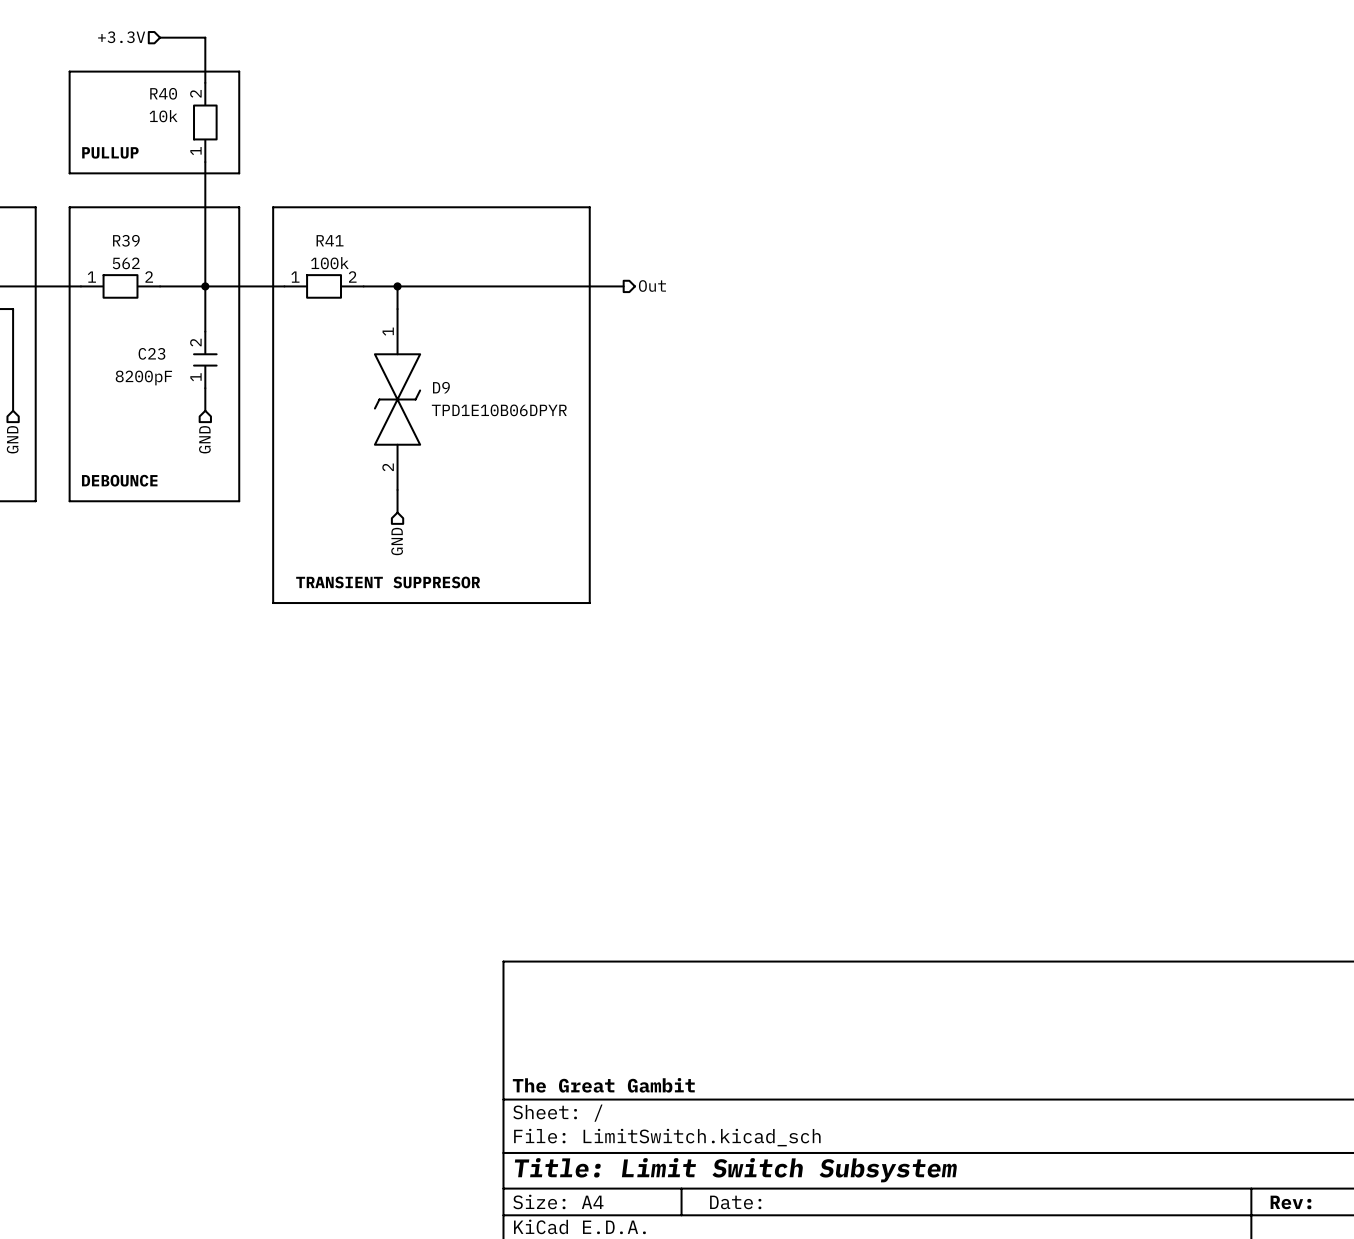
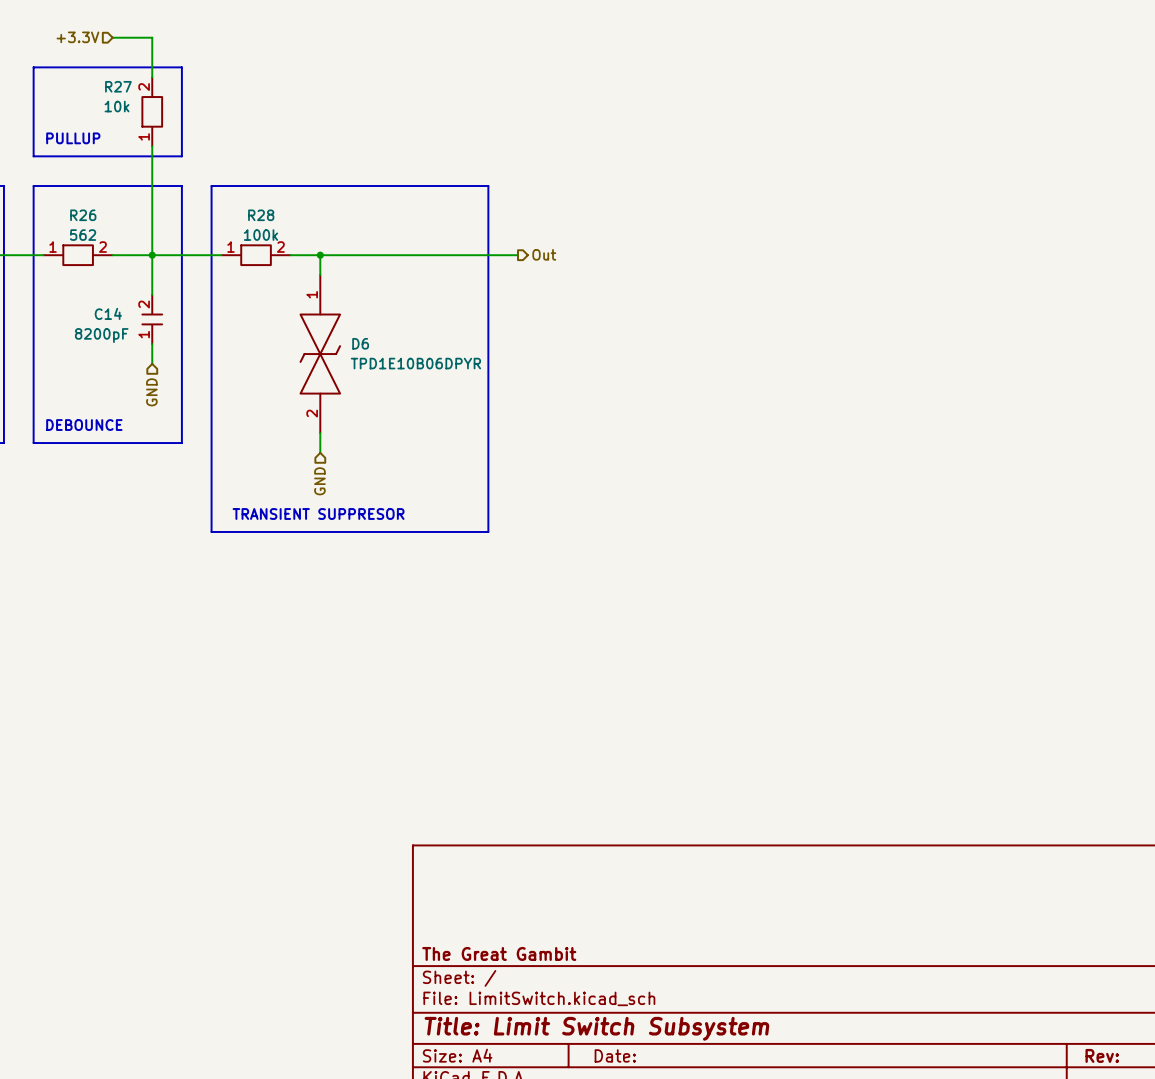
R40 name: R40 (163, 93) -> R27 (118, 86)
R39 name: R39 (126, 240) -> R26 (83, 215)
R41 name: R41 (330, 240) -> R28 (261, 215)
C23 name: C23 (151, 353) -> C14 (108, 313)
D9 name: D9 (441, 387) -> D6 (360, 343)

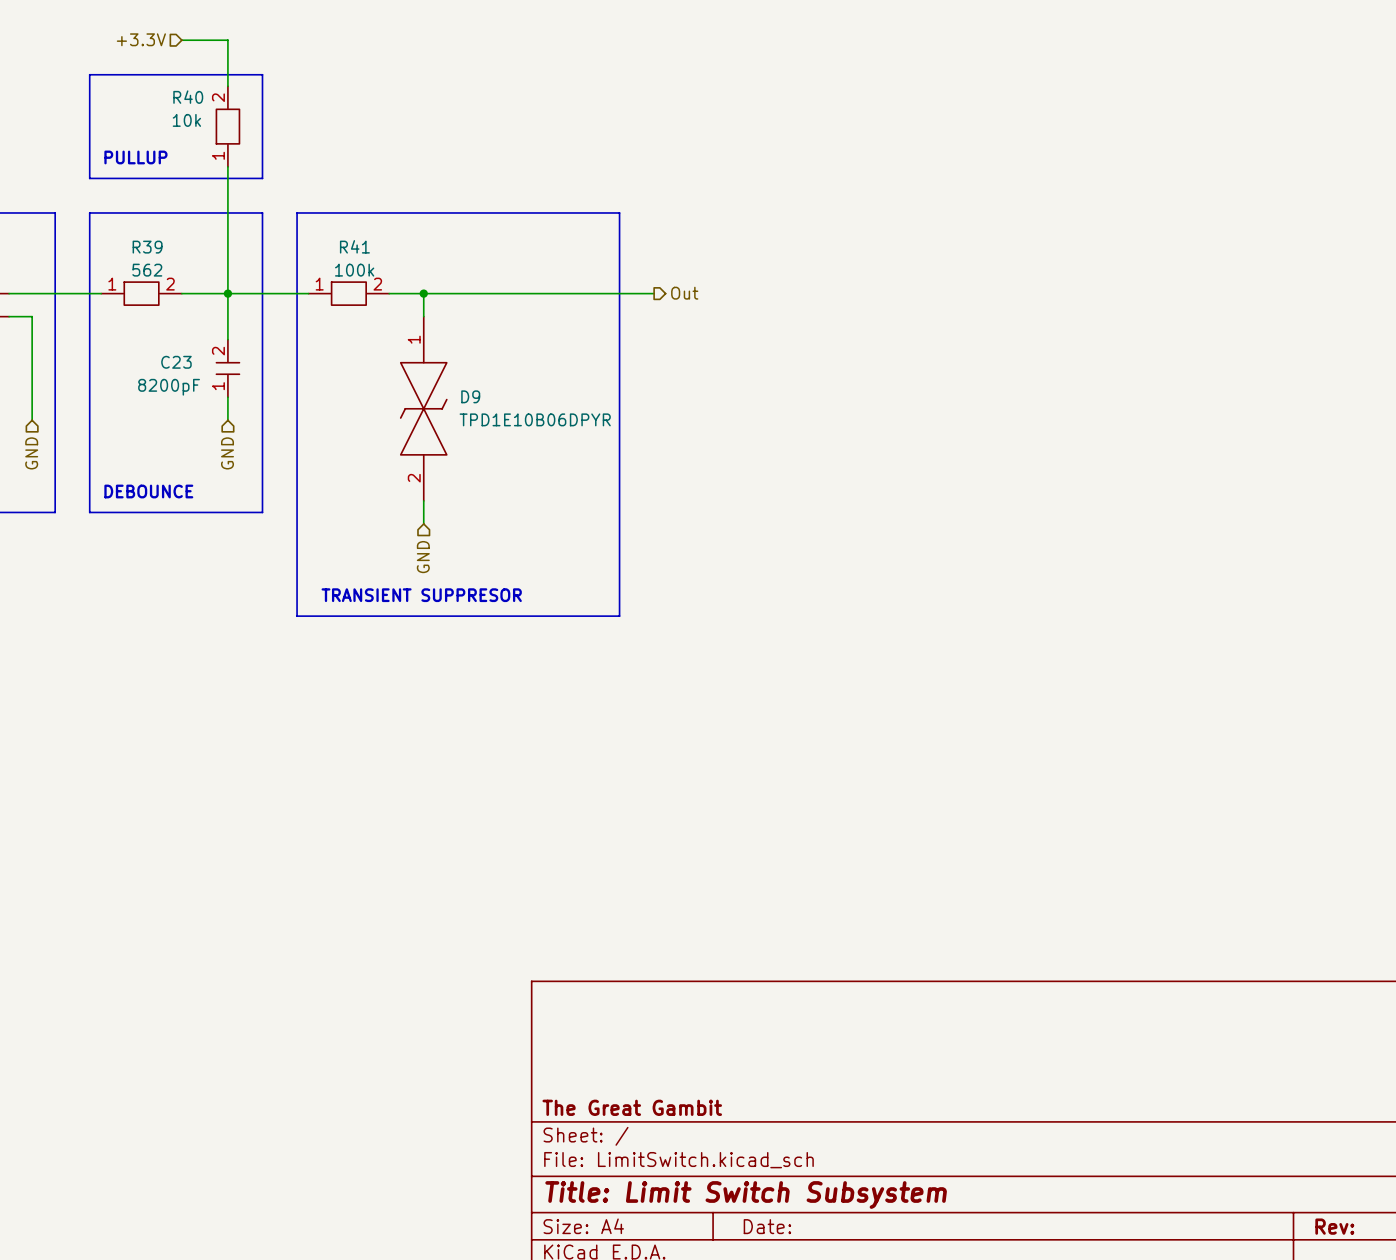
R27 name: R27 (118, 86) -> R40 (188, 97)
R26 name: R26 (83, 215) -> R39 (147, 247)
R28 name: R28 (261, 215) -> R41 (354, 246)
C14 name: C14 (108, 313) -> C23 (176, 362)
D6 name: D6 (360, 343) -> D9 (470, 396)

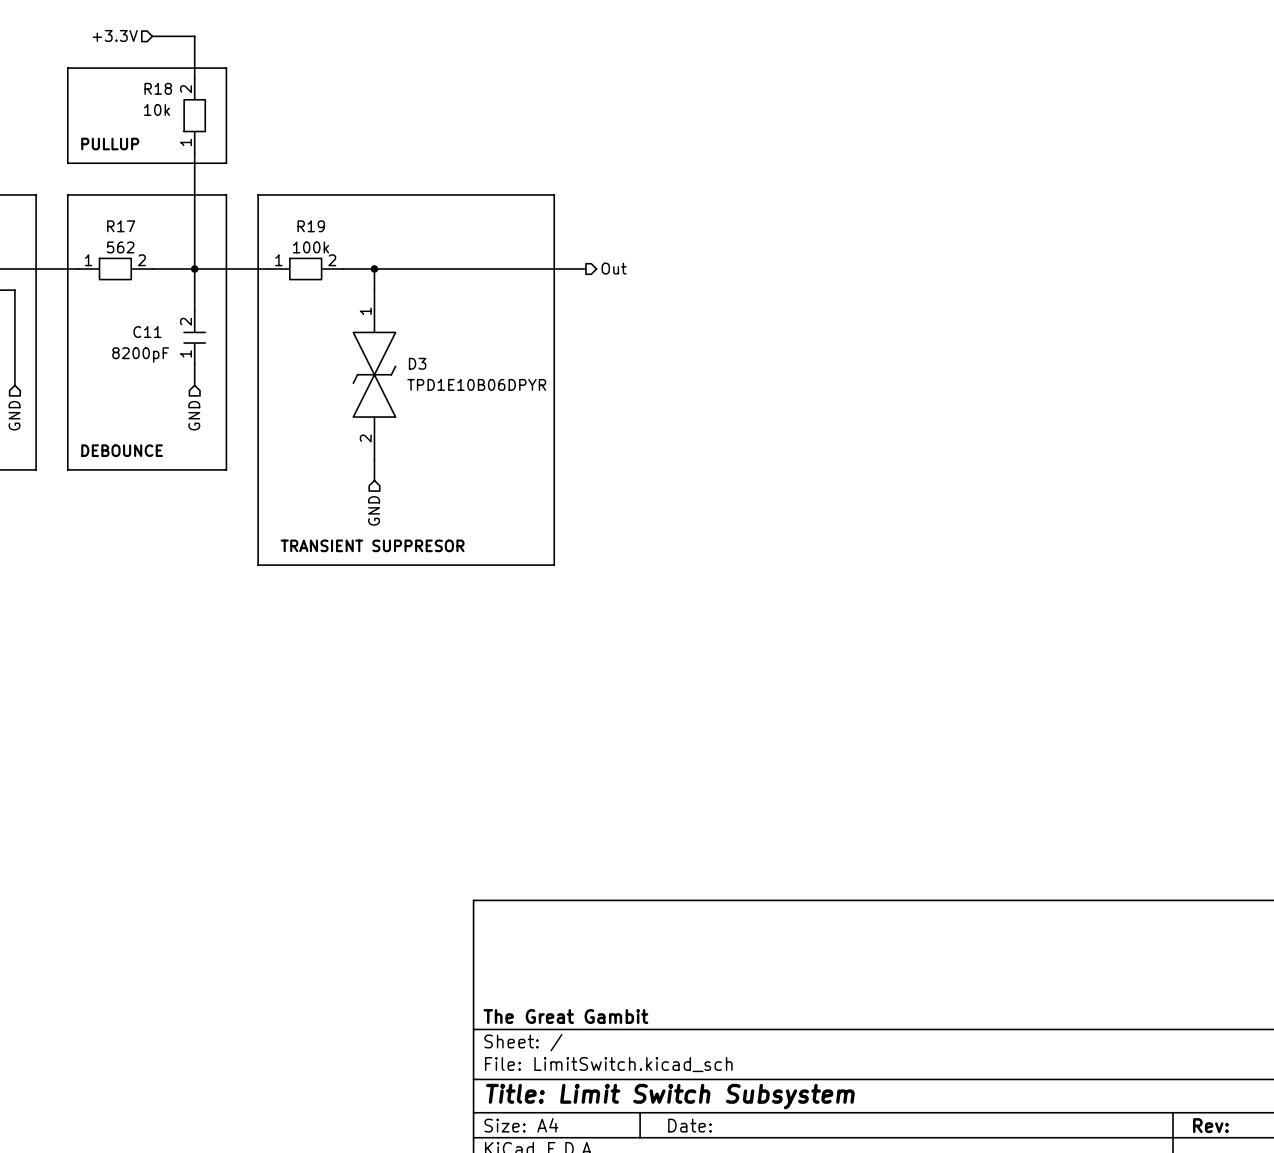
R40 name: R40 (188, 97) -> R18 (158, 88)
R41 name: R41 (354, 246) -> R19 (311, 226)
R39 name: R39 (147, 247) -> R17 (121, 226)
C23 name: C23 (176, 362) -> C11 (147, 332)
D9 name: D9 (470, 396) -> D3 (417, 363)

